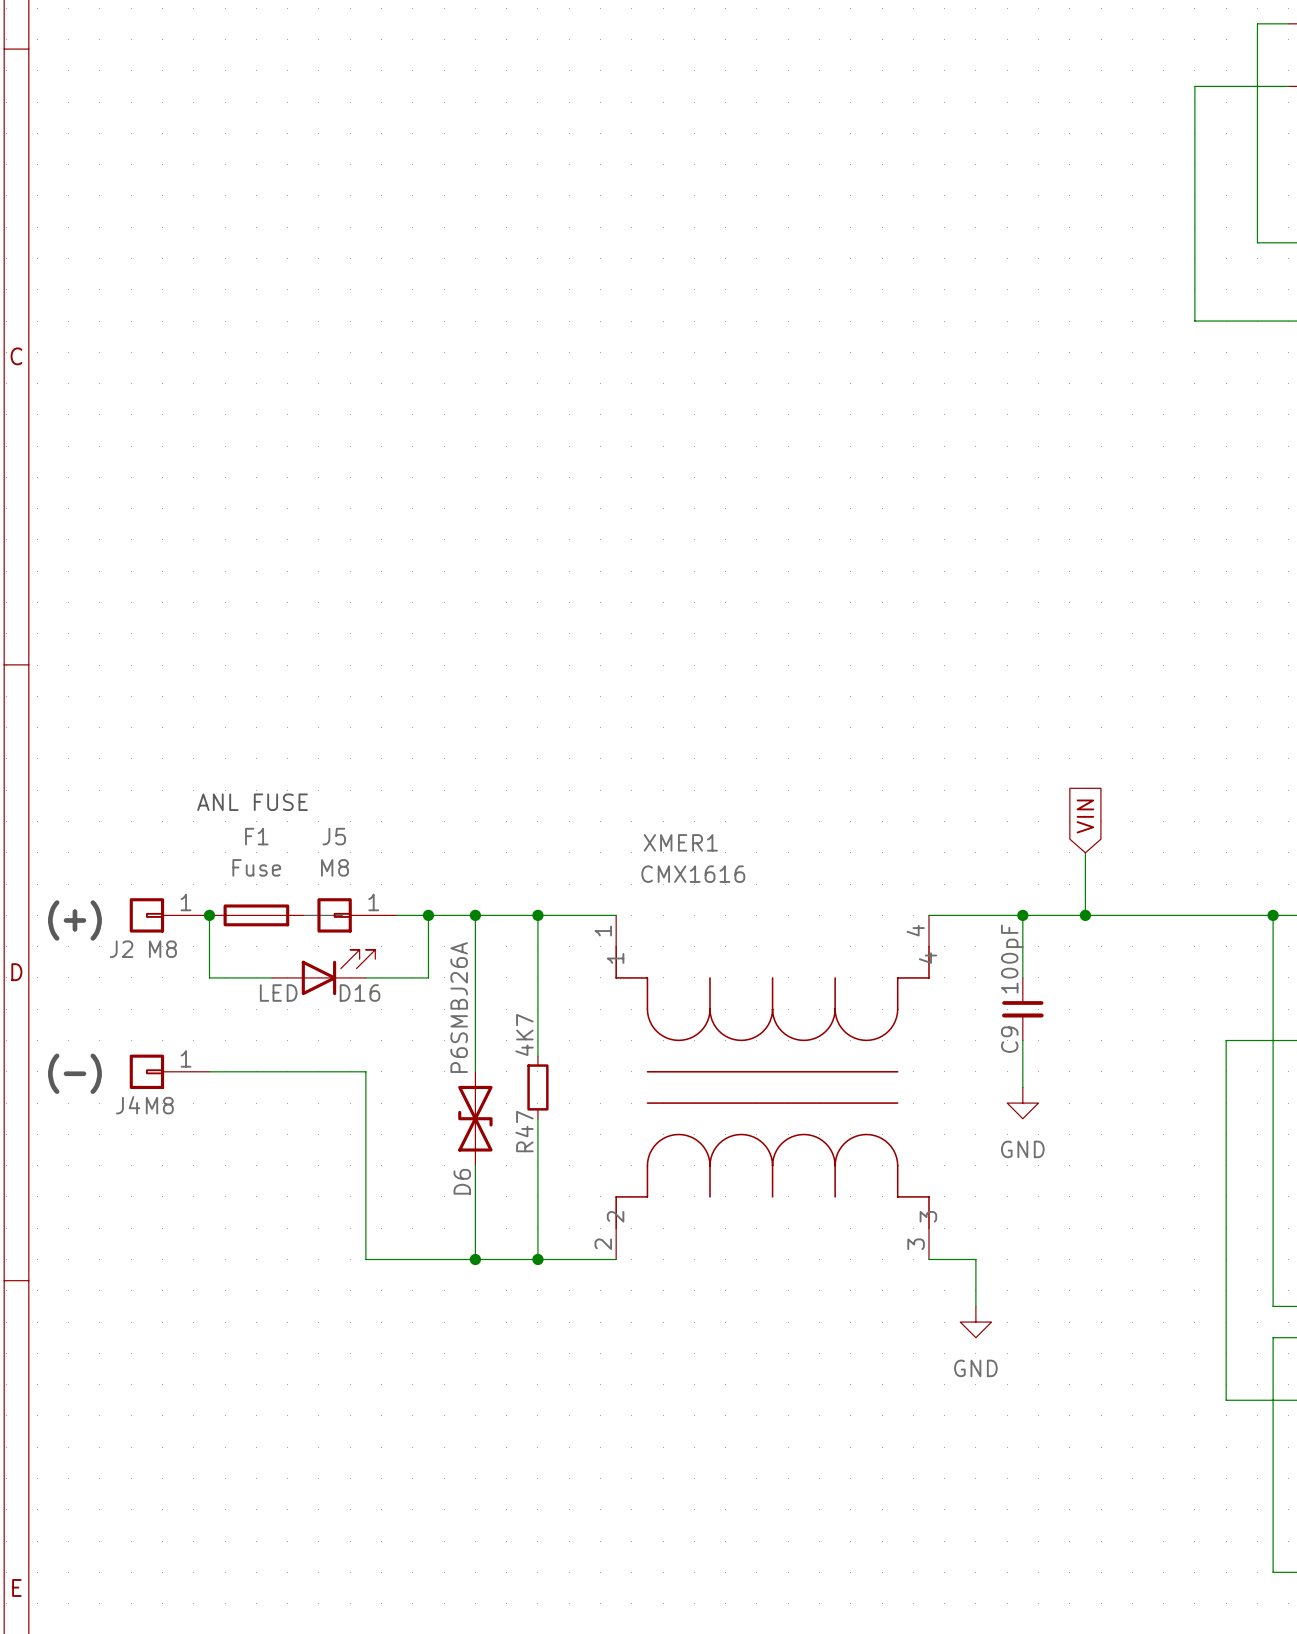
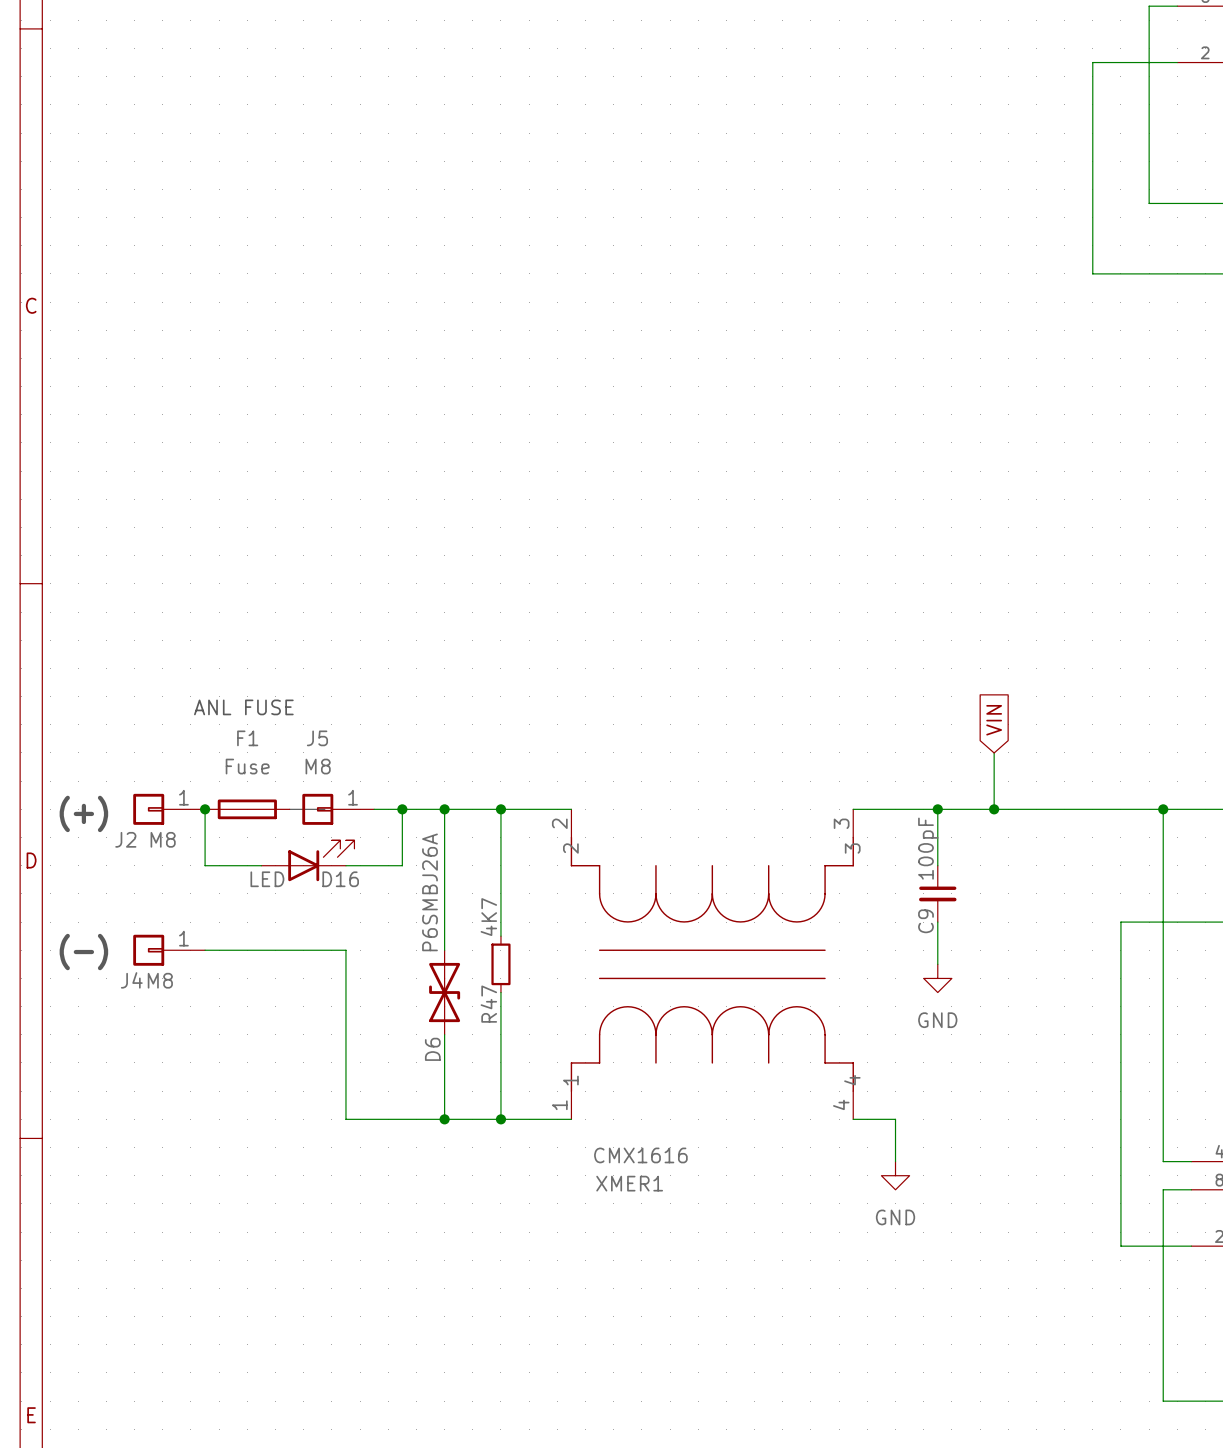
XMER1 flip: as is (772, 1087) -> up-down (712, 964)

